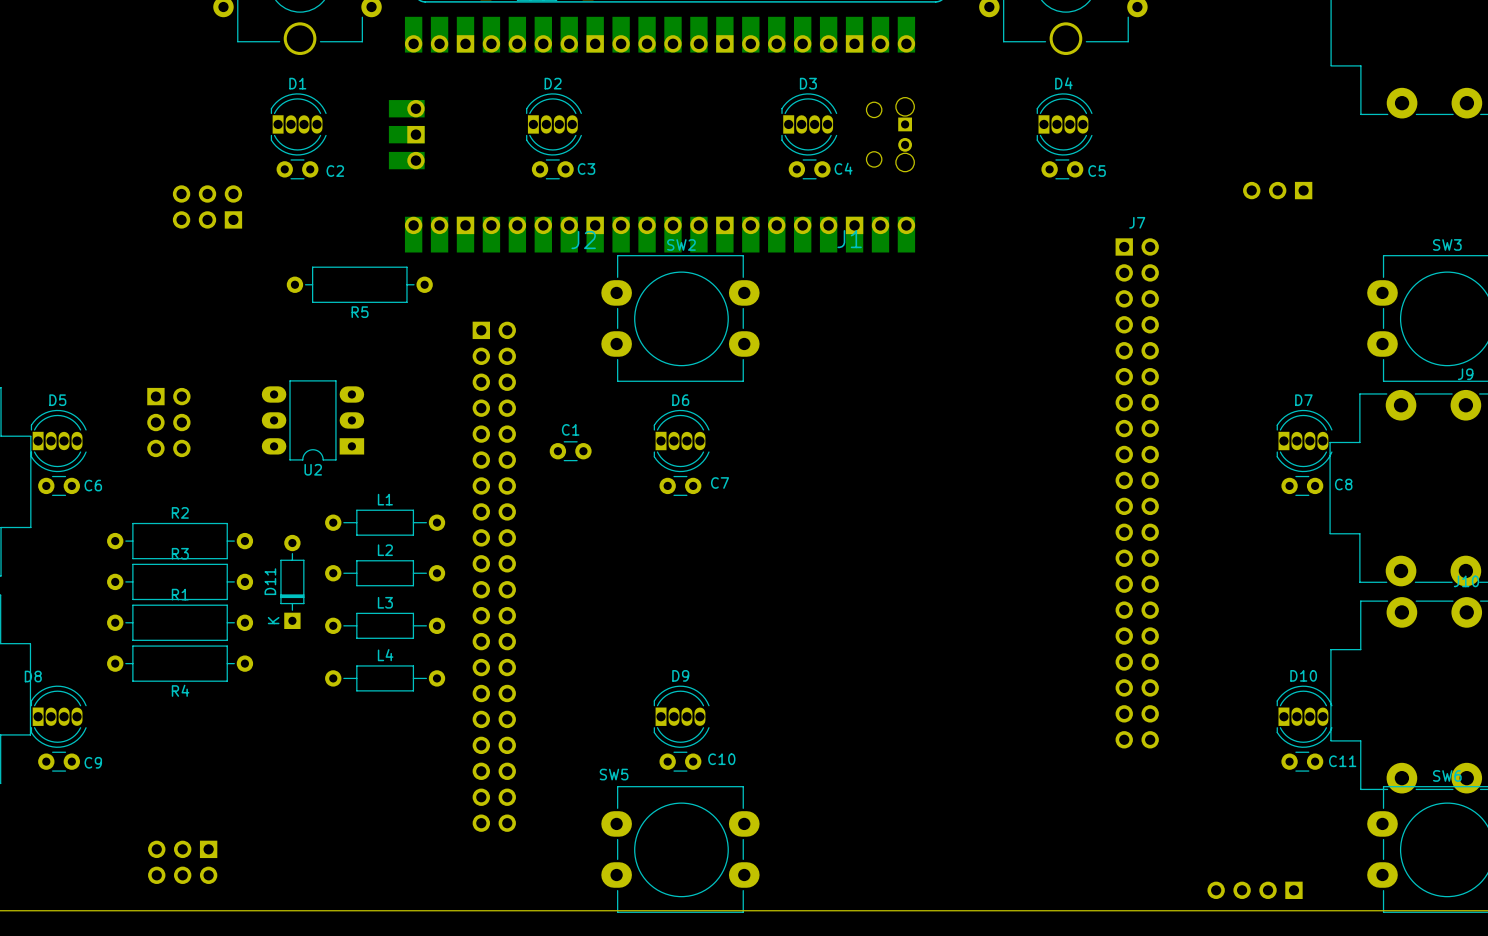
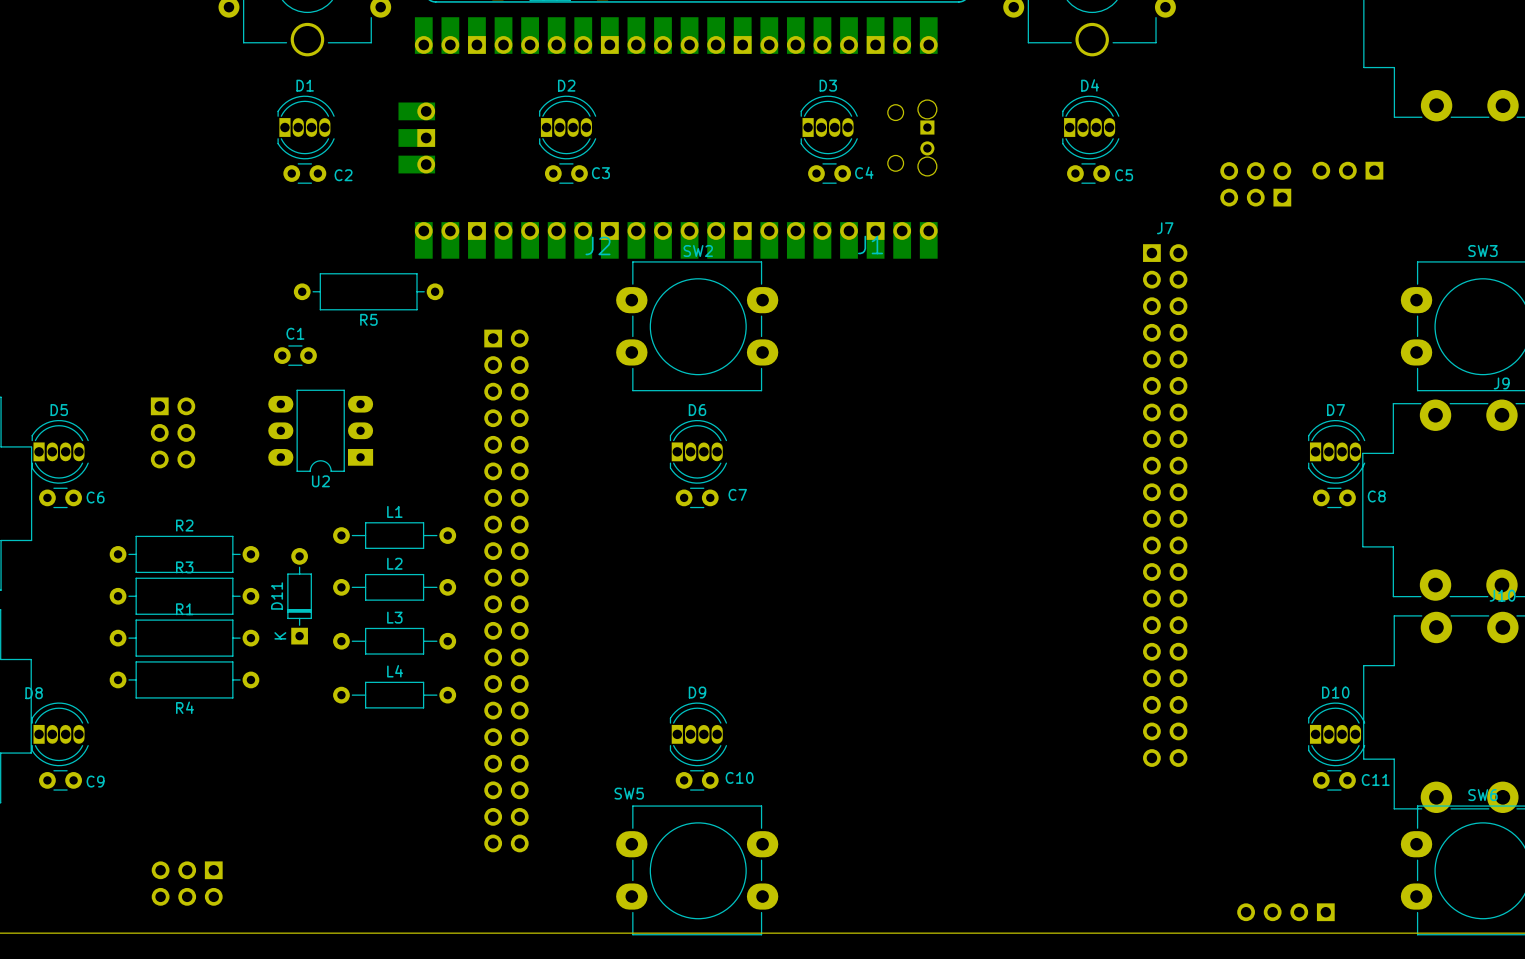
part: none -> (1255, 184)
part position: (1277, 190) -> (1347, 170)
part: (207, 206) -> none
C1 position: (570, 451) -> (295, 355)

